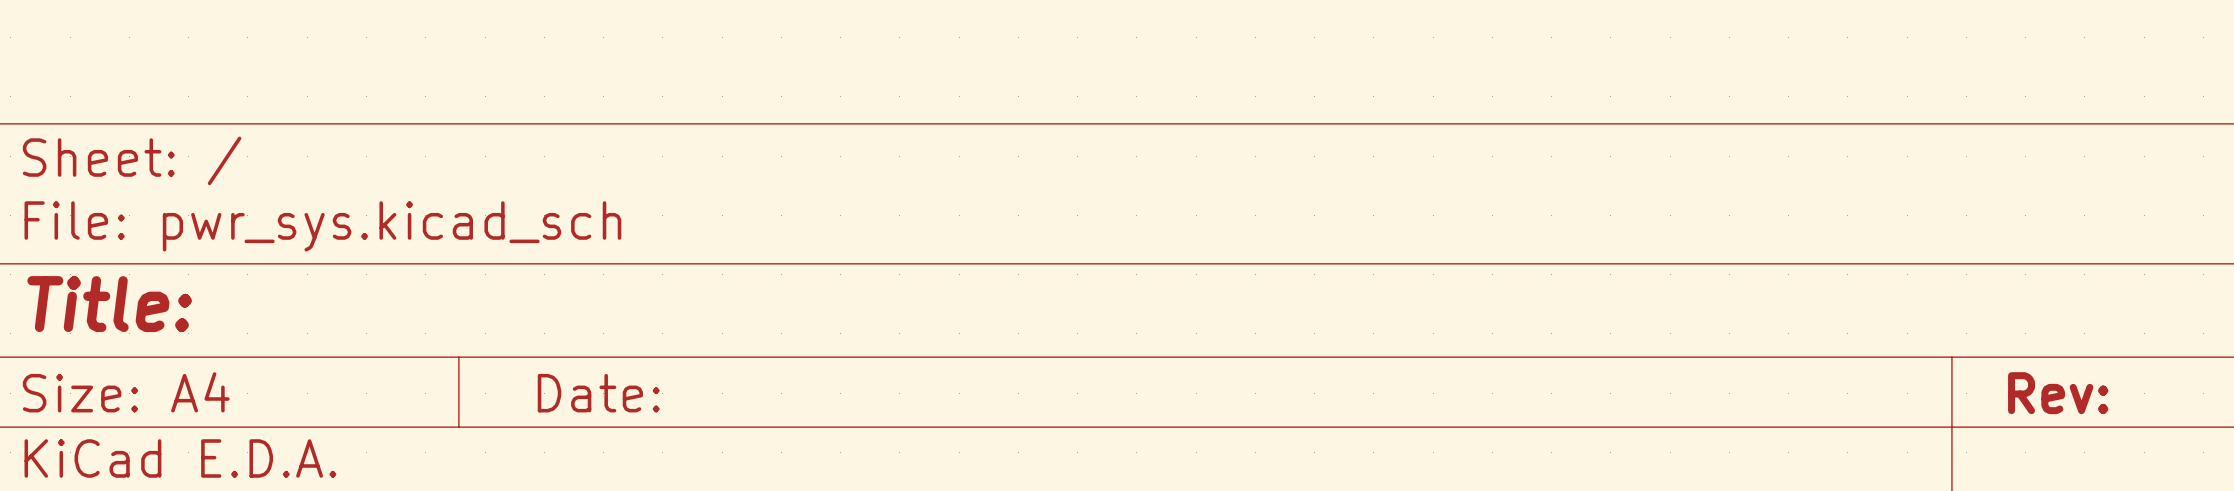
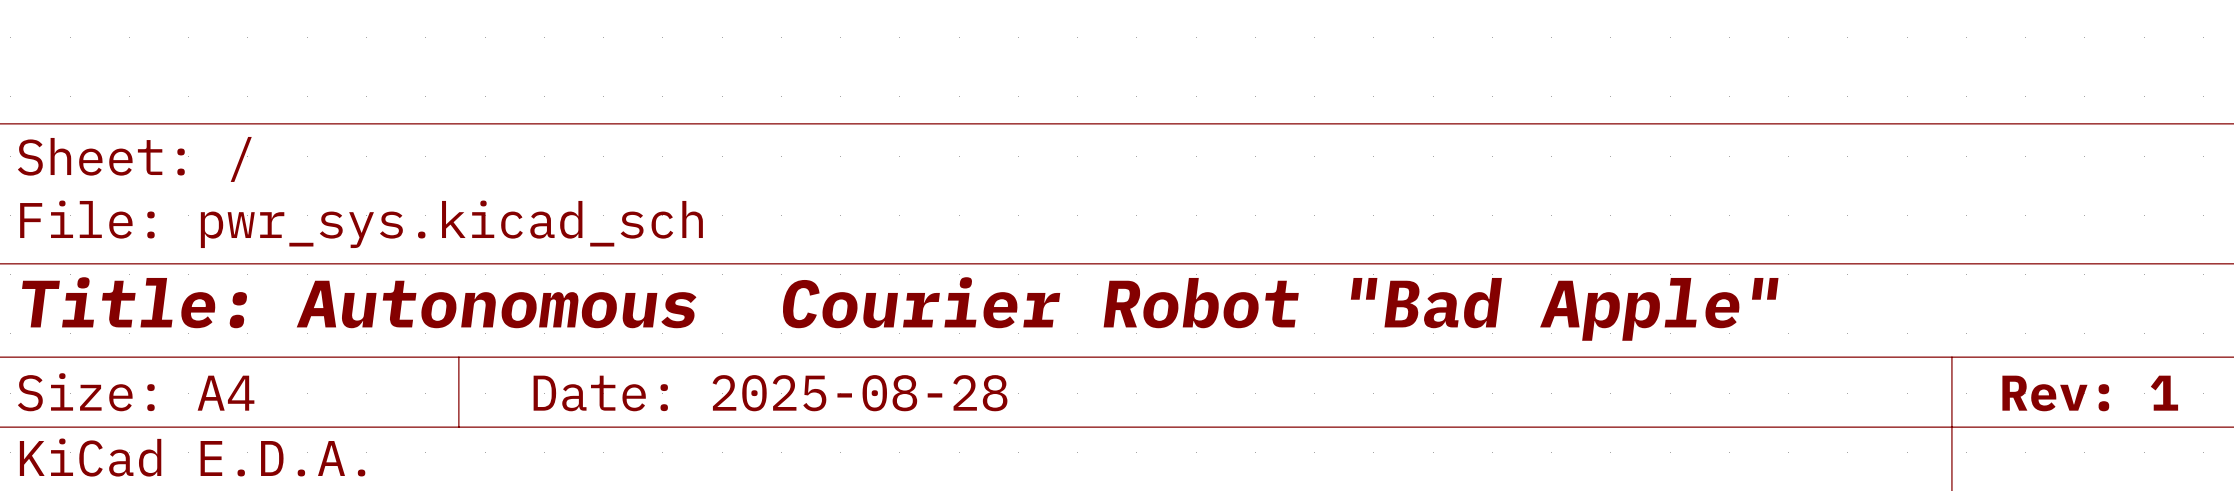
title block: Title: (109, 304) -> Title: Autonomous Courier Robot "Bad Apple" (900, 309)
title block: Date: (598, 393) -> Date: 2025-08-28 (770, 393)
title block: Rev: (2058, 393) -> Rev: 1 (2090, 393)

